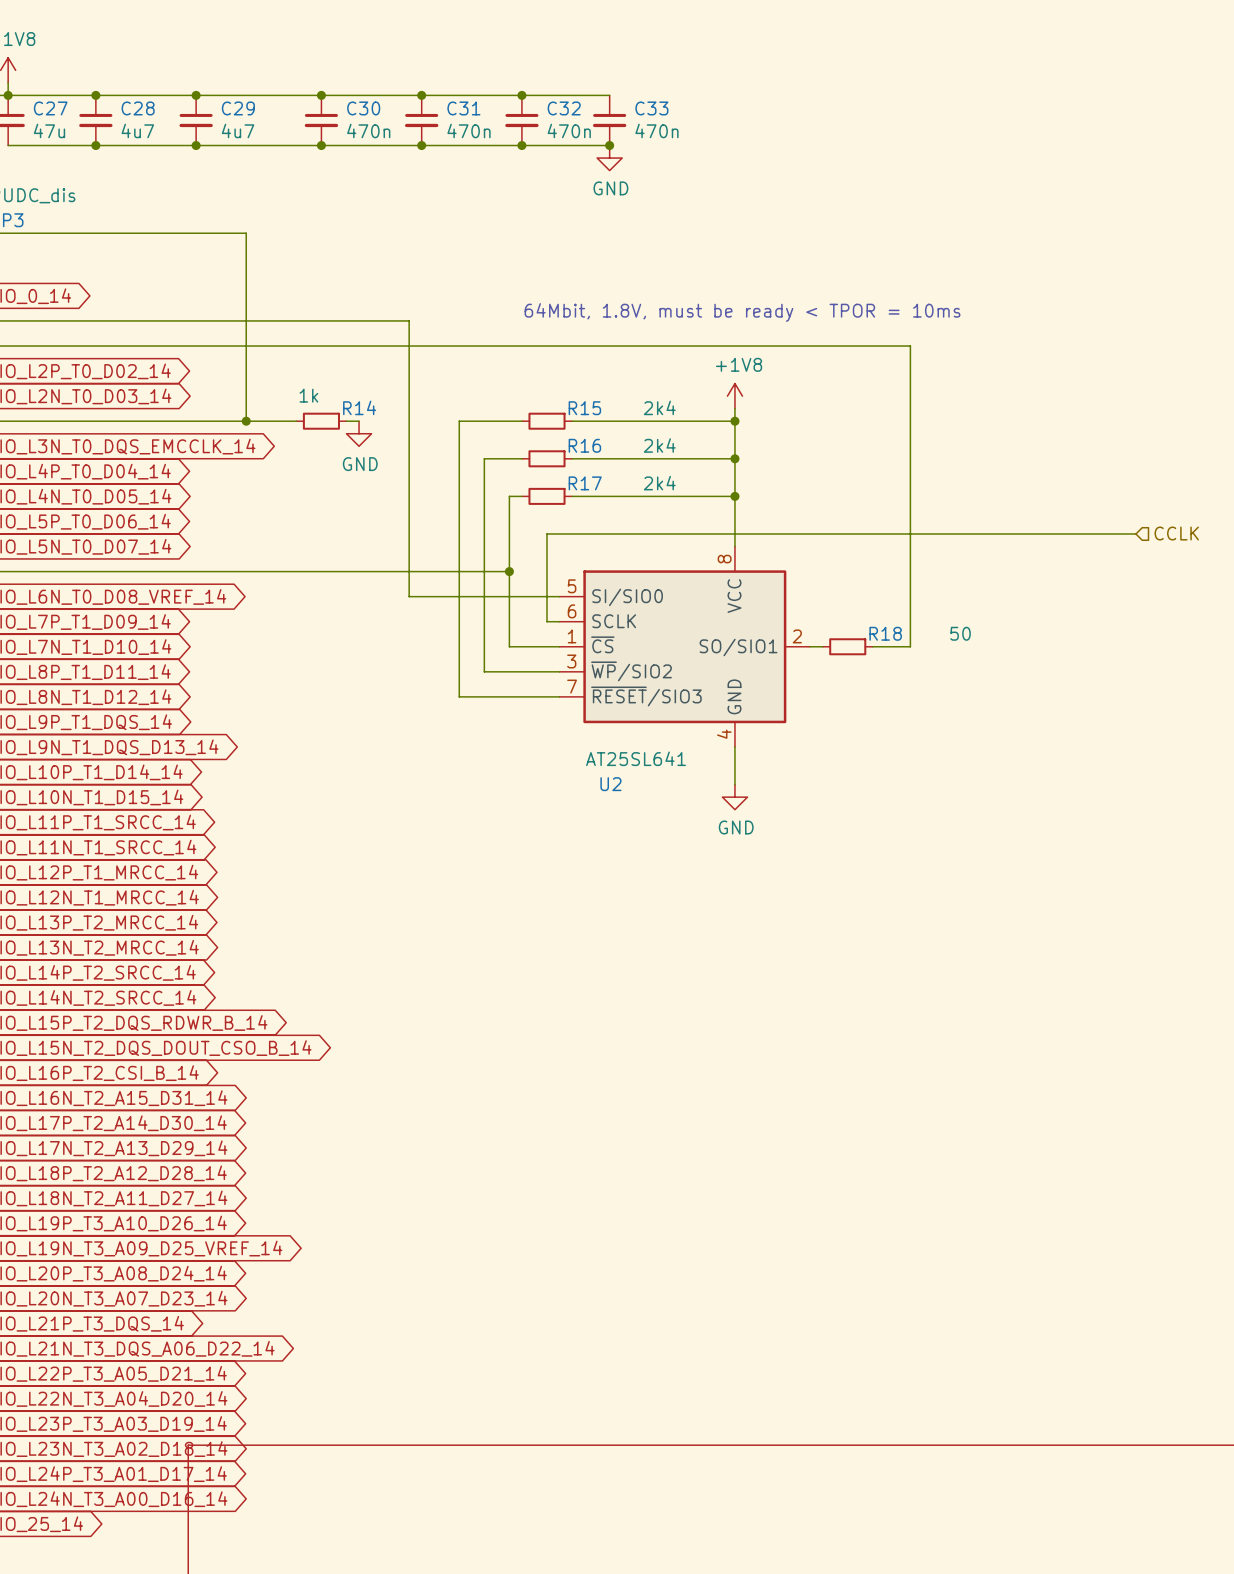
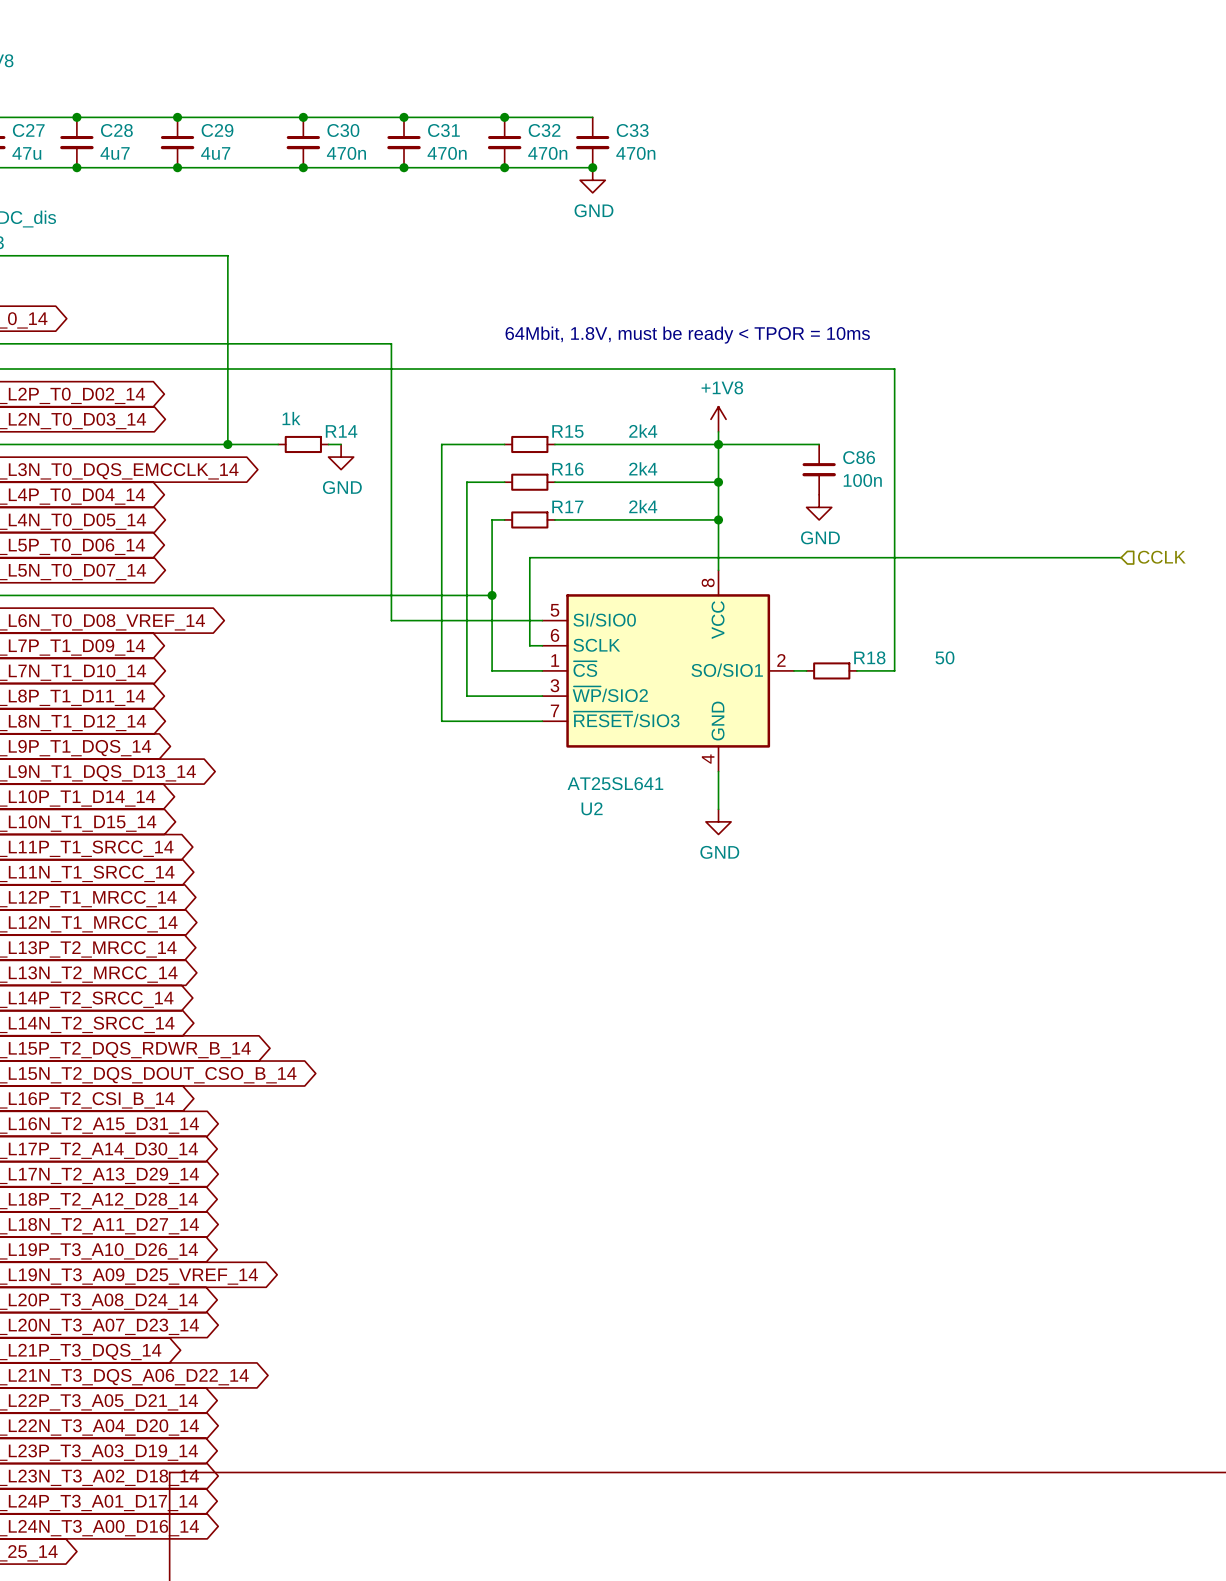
wire: none -> (718, 444) (819, 444)
C86: none -> 100n (819, 469)
power symbol: none -> GND (819, 507)

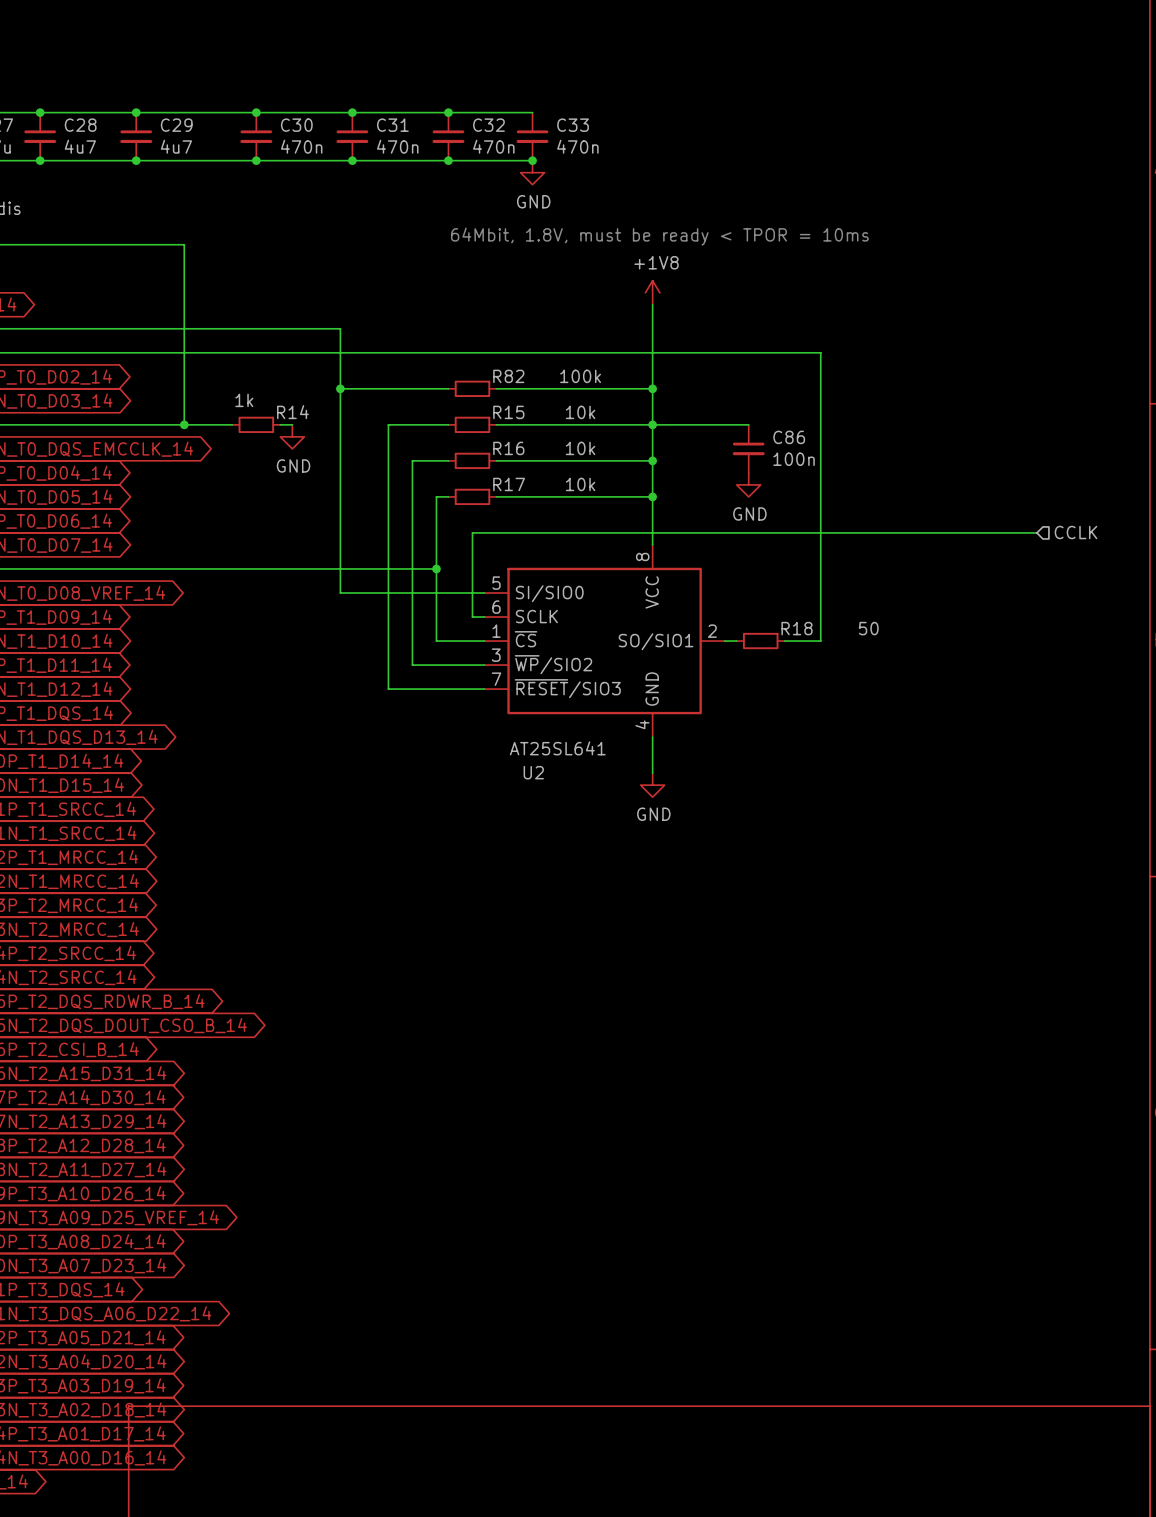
wire: none -> (652, 304) (652, 412)
text position: 64Mbit, 1.8V, must be ready < TPOR = 10ms (687, 335) -> 64Mbit, 1.8V, must be ready < TPOR = 10ms (659, 236)
wire: none -> (340, 388) (448, 388)
junction: none -> (340, 388)
R82: none -> 100k (472, 388)
wire: none -> (496, 388) (652, 388)
junction: none -> (652, 388)
power symbol position: +1V8 (718, 419) -> +1V8 (652, 292)
R15 value: 2k4 (643, 431) -> 10k (580, 412)
R16 value: 2k4 (643, 468) -> 10k (580, 448)
R17 value: 2k4 (643, 506) -> 10k (580, 484)

